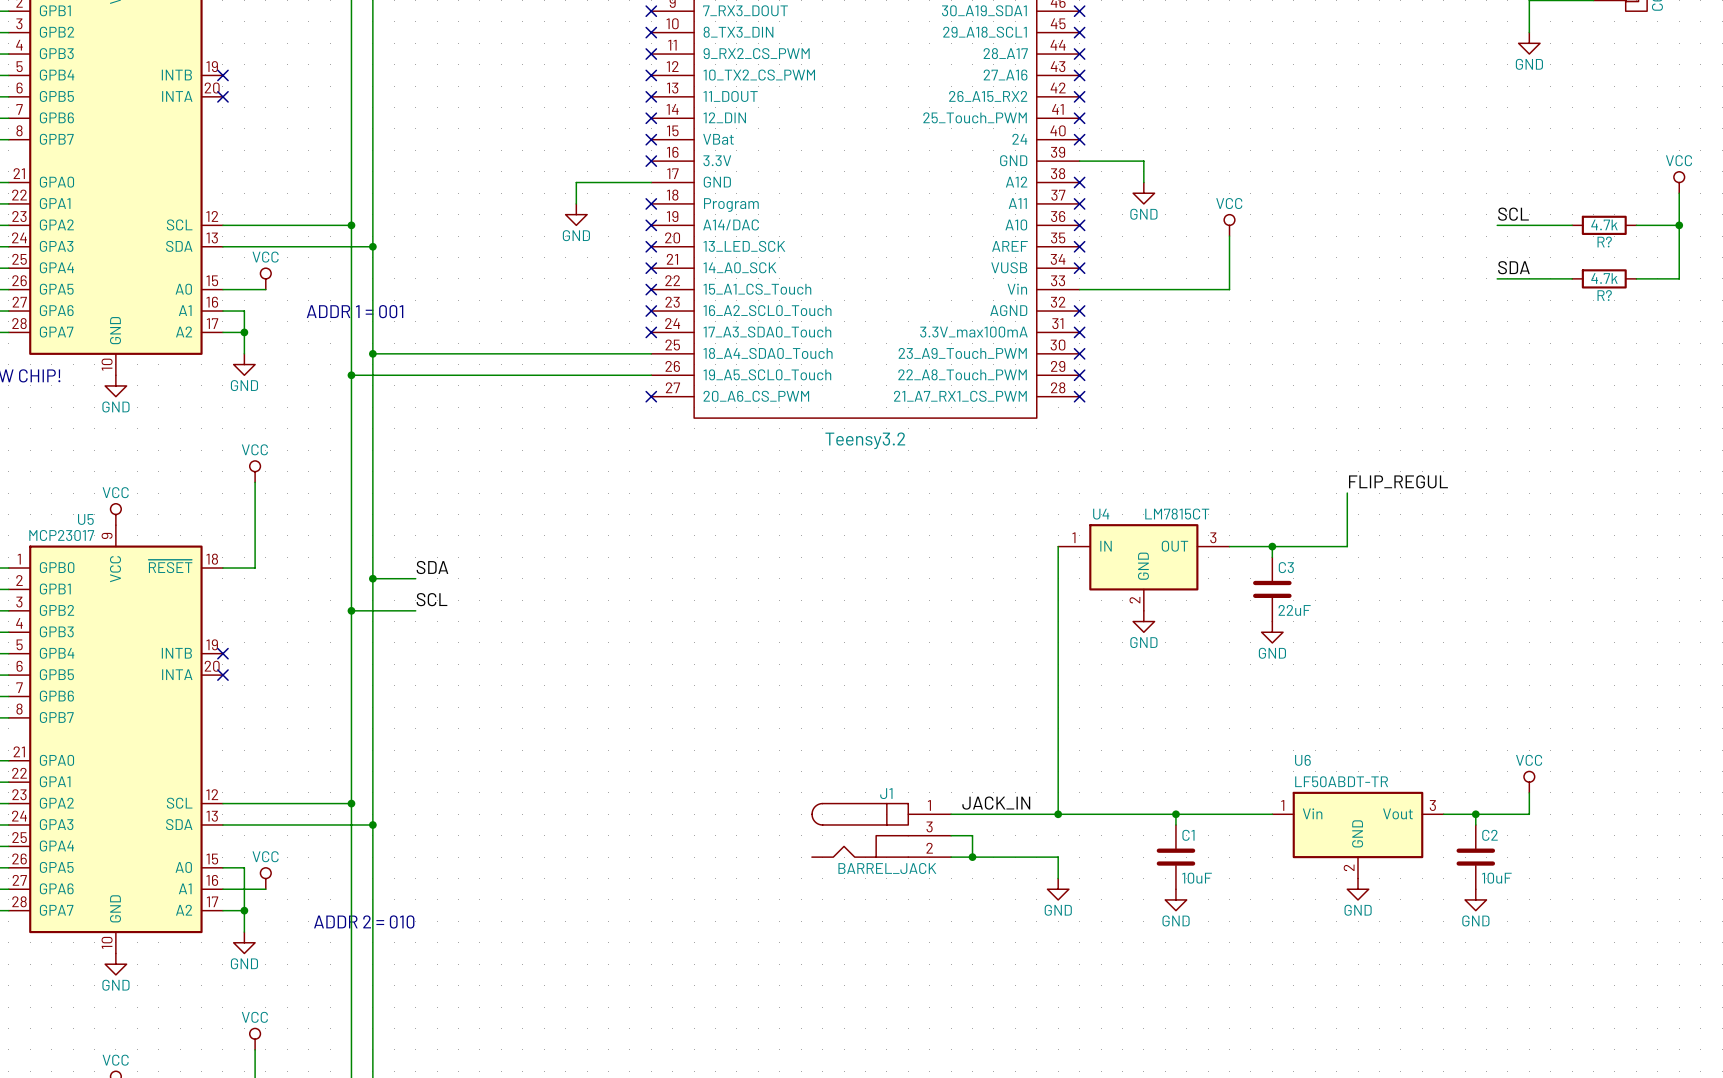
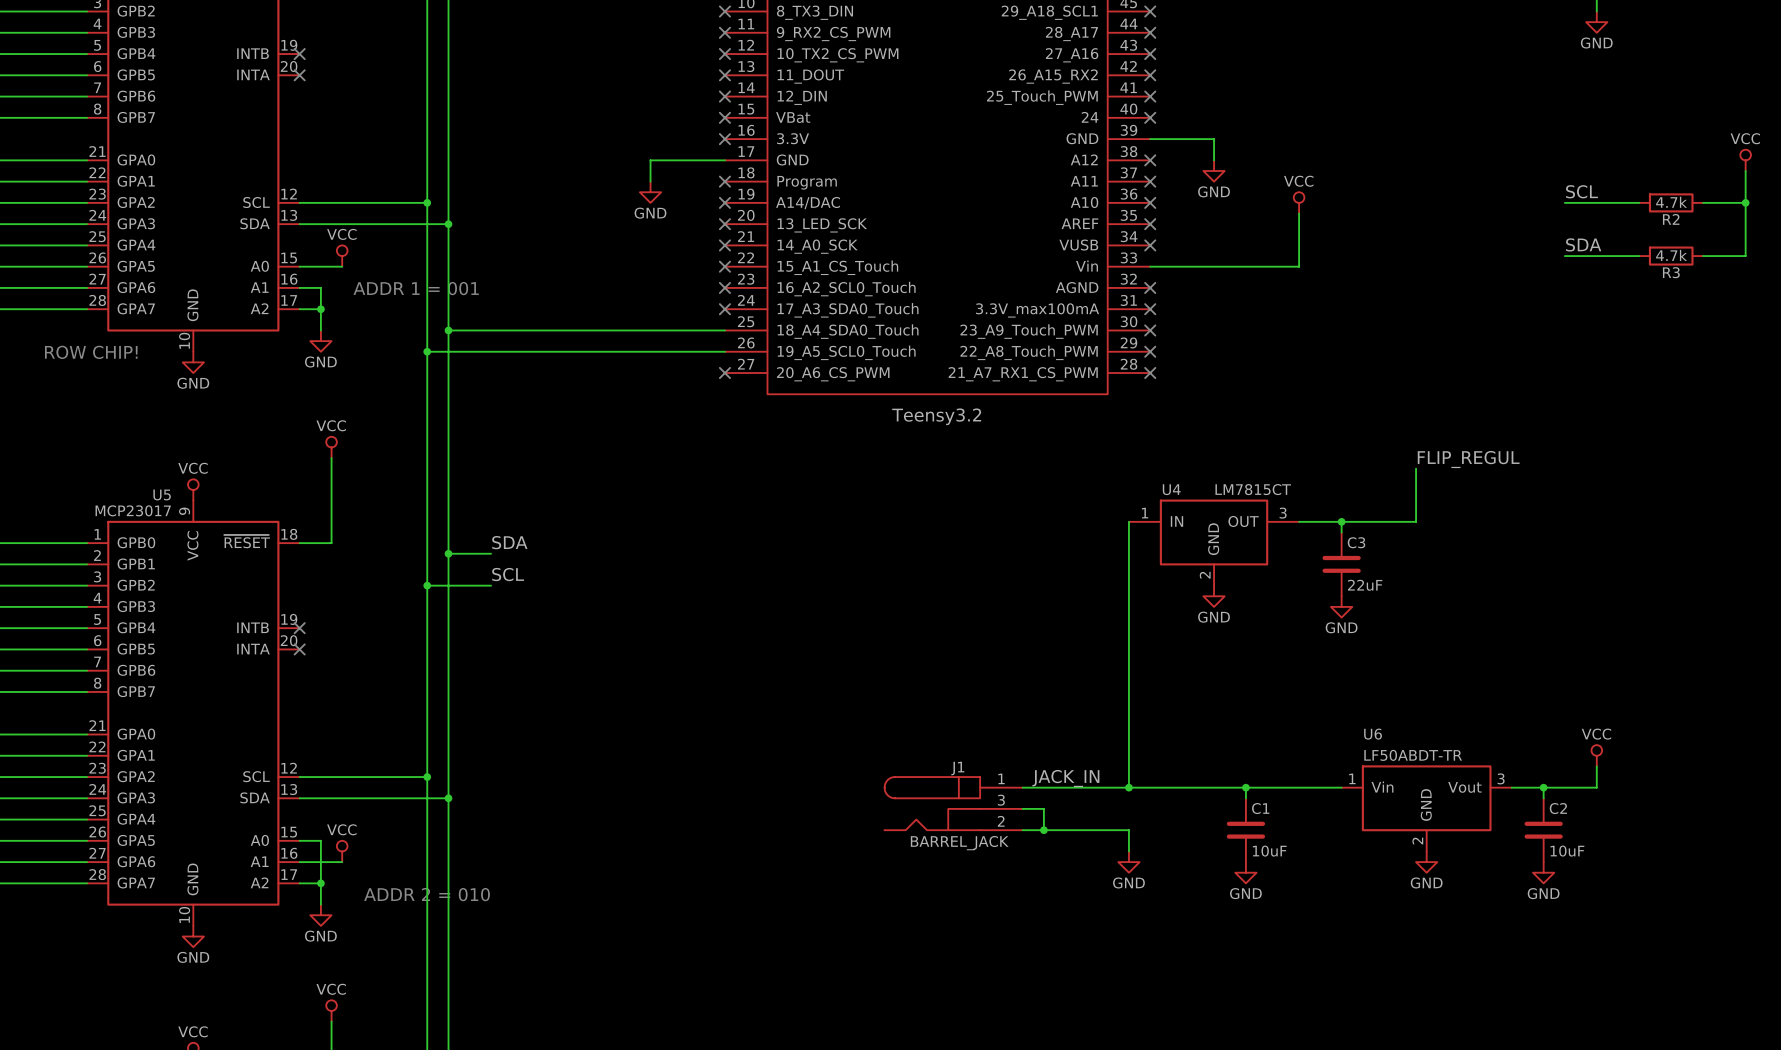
R? name: R? (1604, 242) -> R2 (1671, 219)
R? name: R? (1604, 295) -> R3 (1671, 272)

